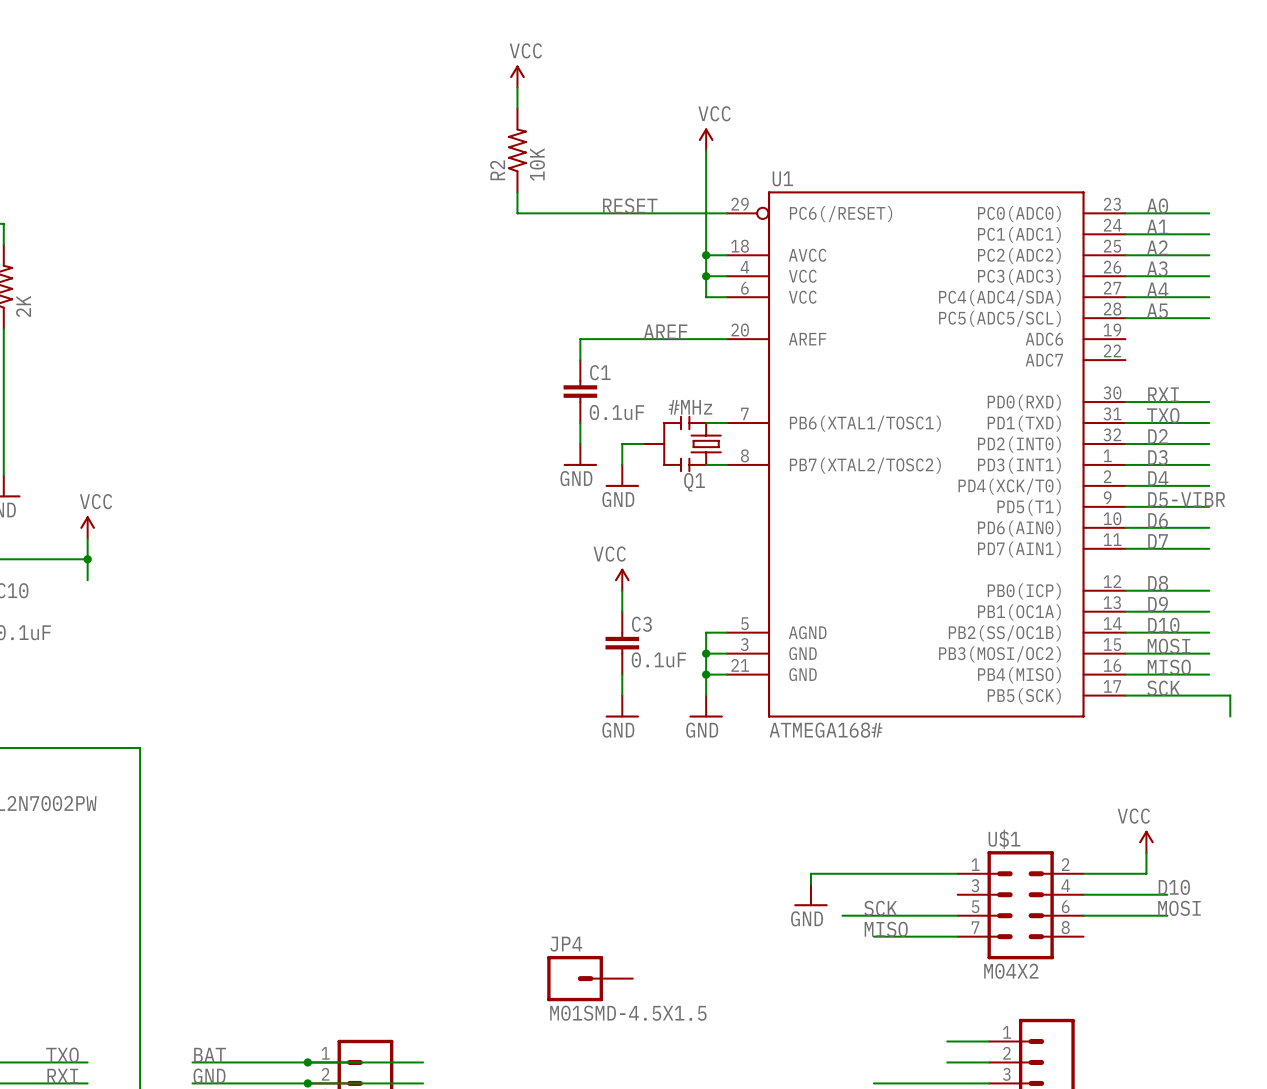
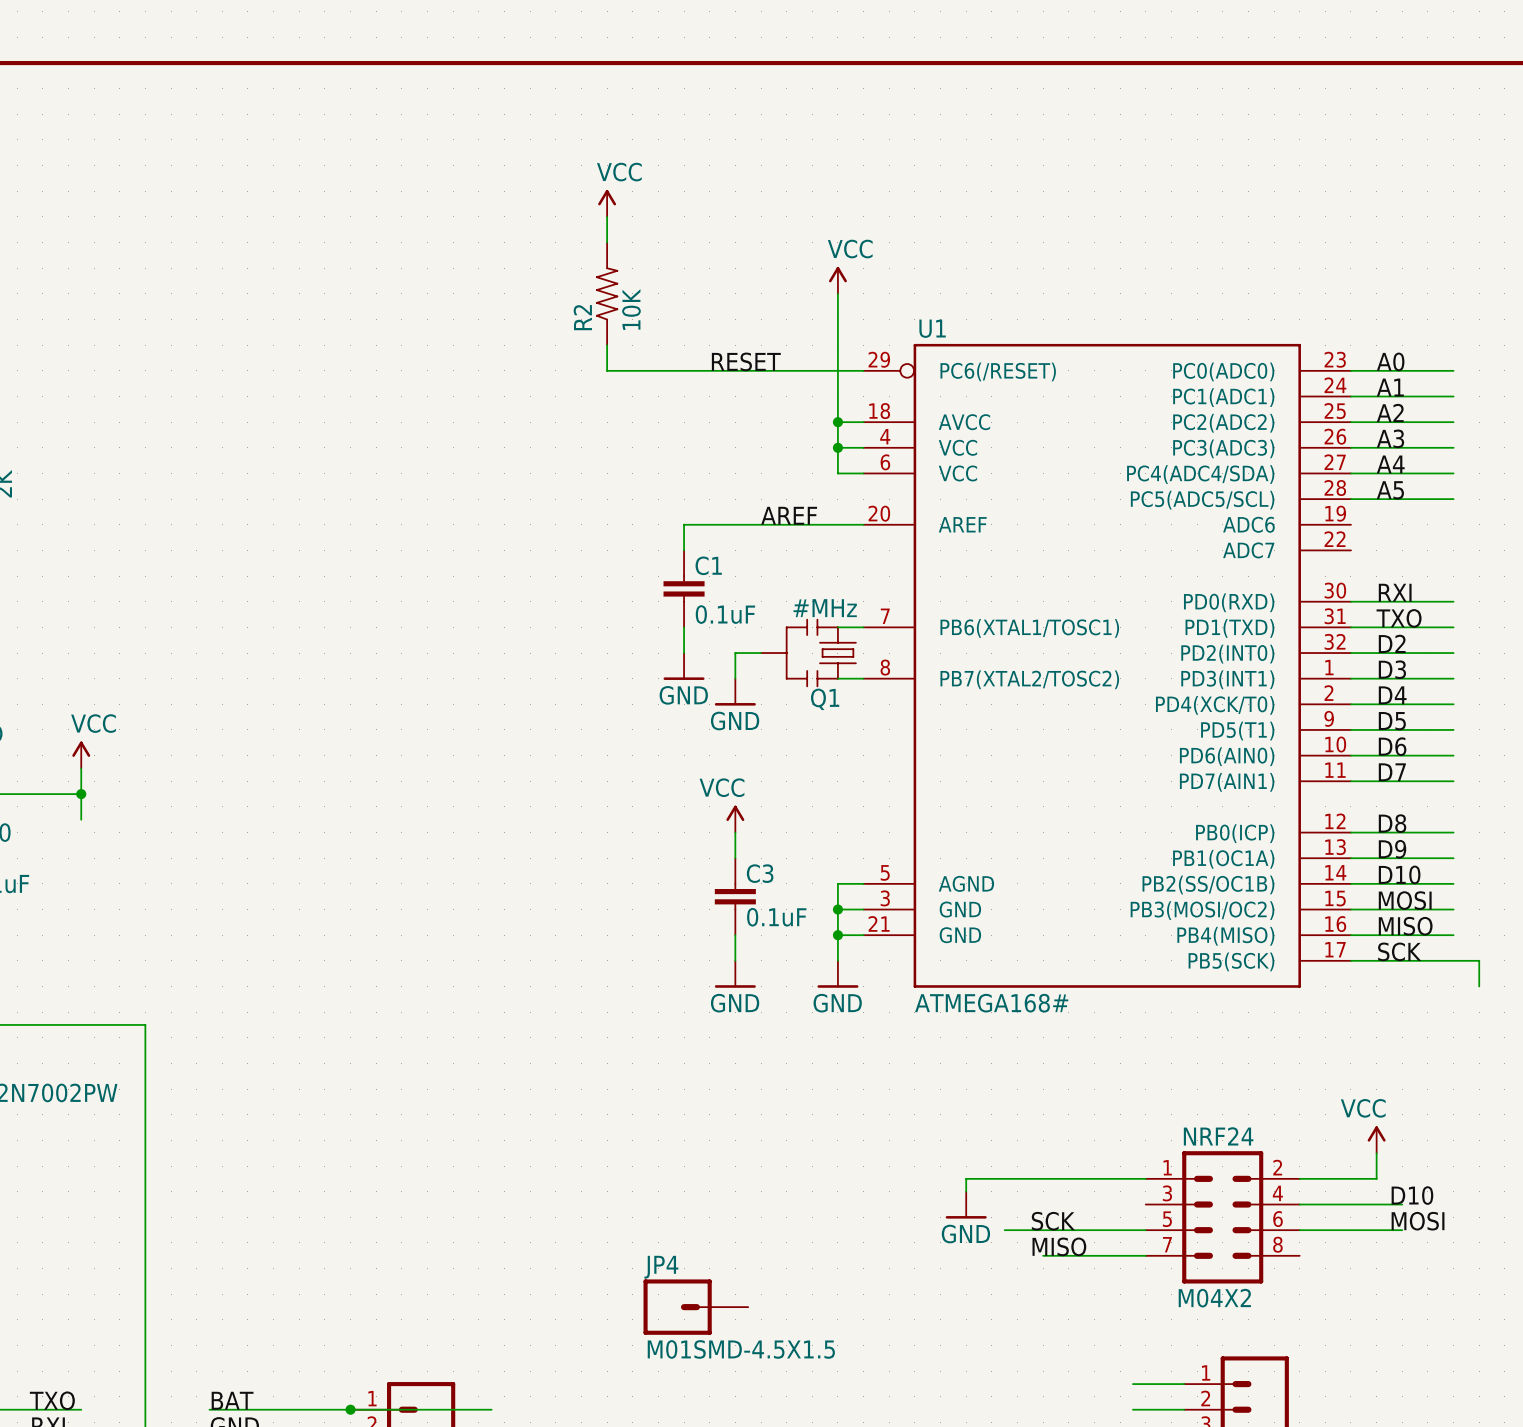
label: D5-VIBR (1186, 499) -> D5 (1392, 721)
U$1 name: U$1 (1004, 839) -> NRF24 (1218, 1136)

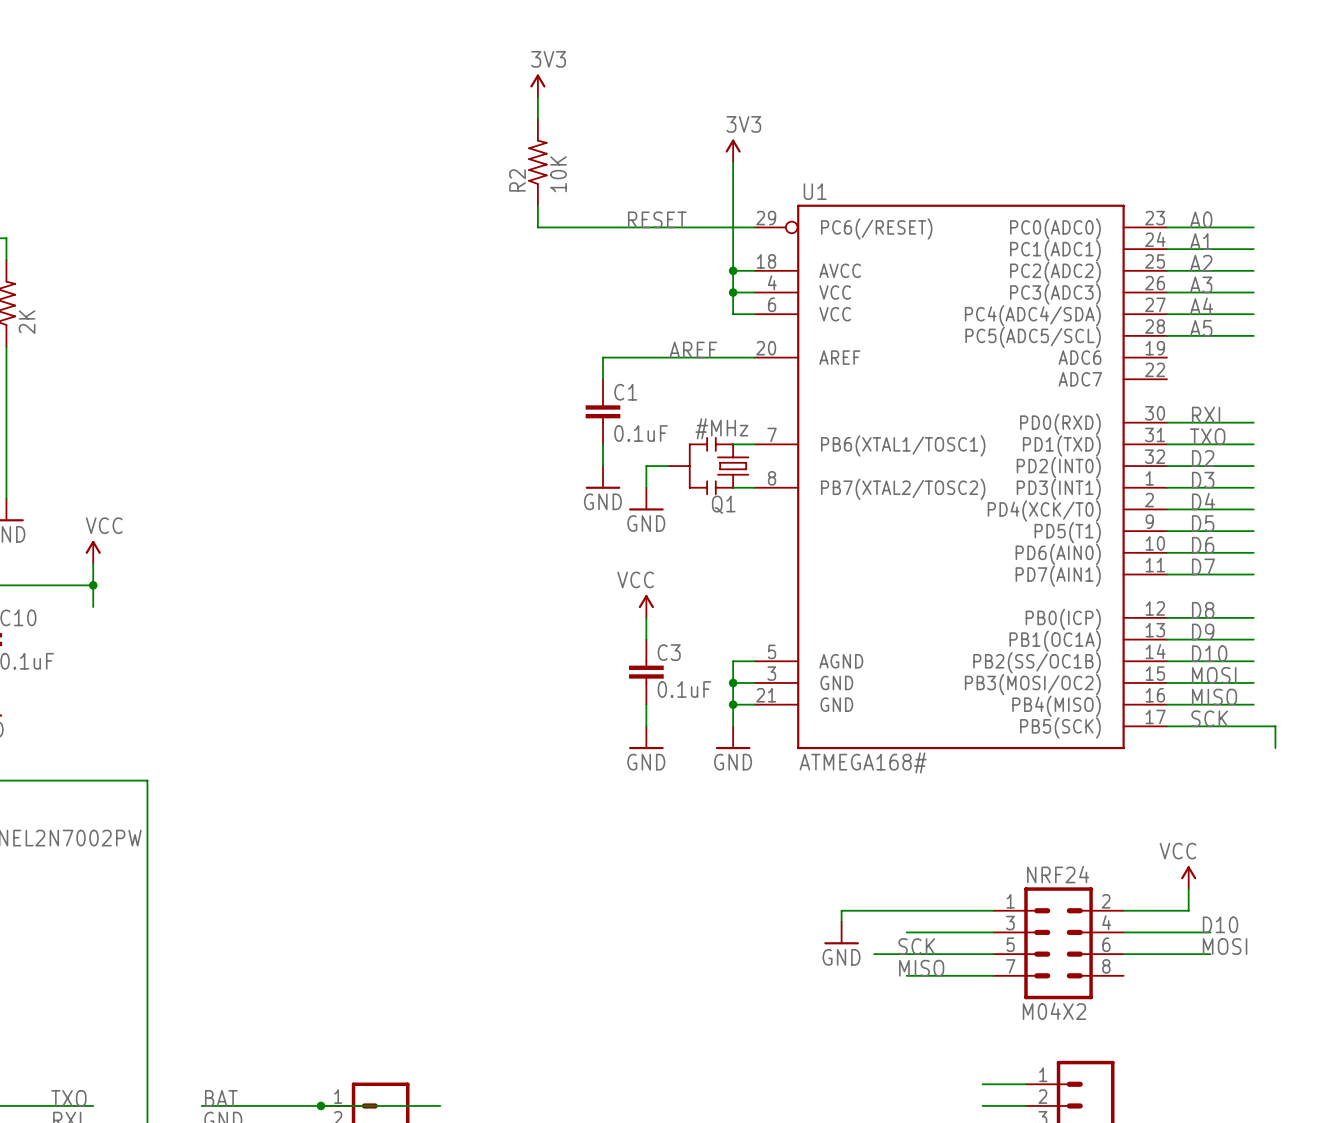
power symbol: VCC (607, 203) -> 3V3 (537, 85)
power symbol: VCC (837, 280) -> 3V3 (733, 150)
wire: none -> (906, 932) (993, 932)
JP4: M01SMD-4.5X1.5 (695, 1307) -> none

